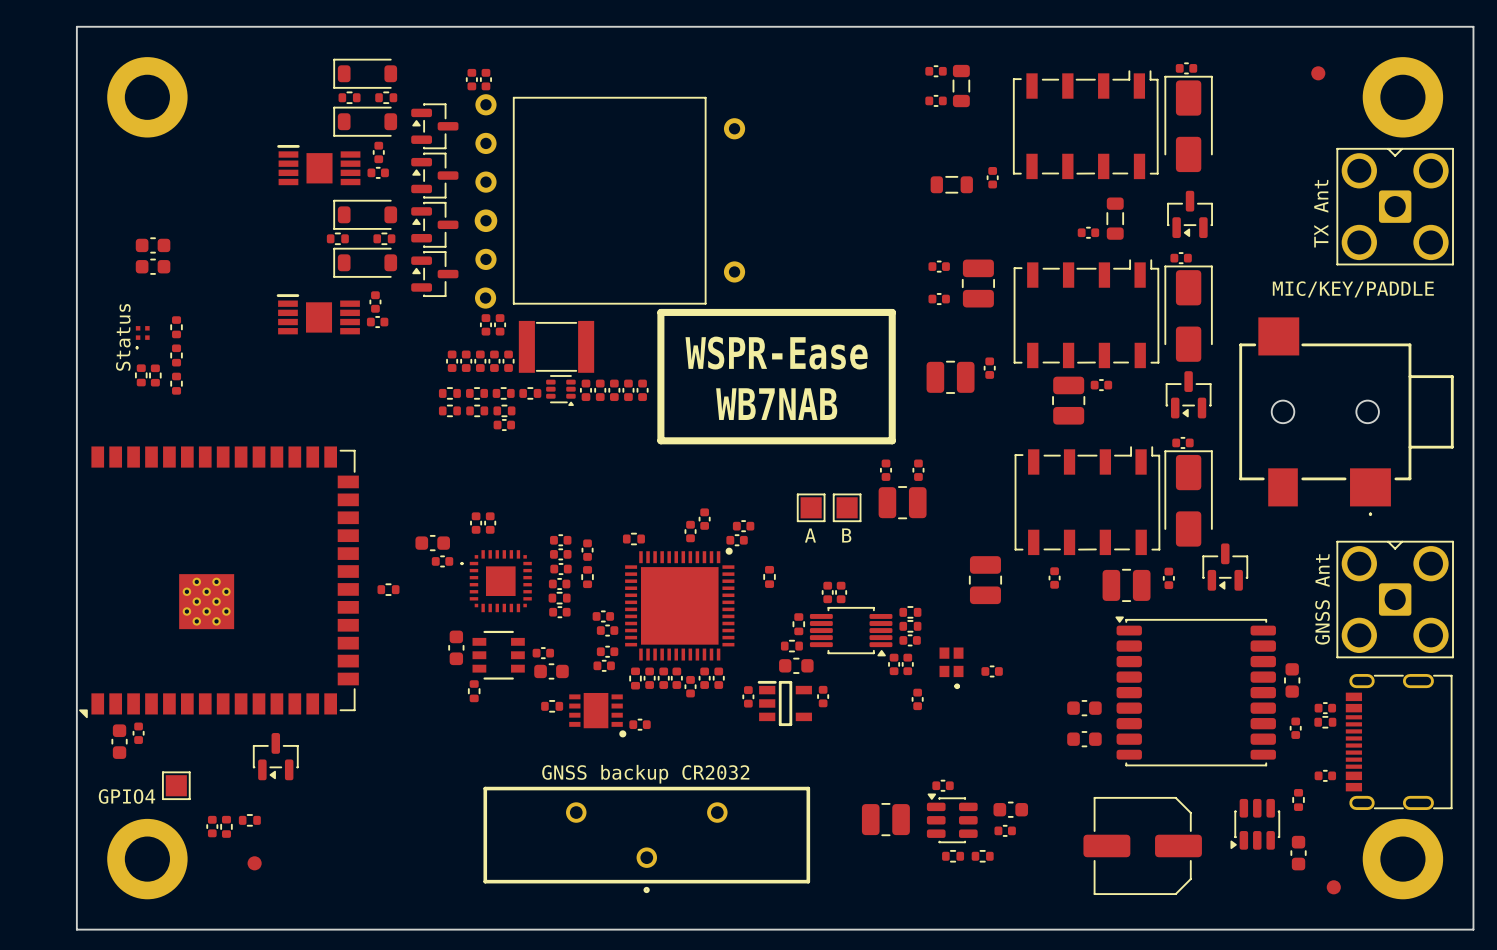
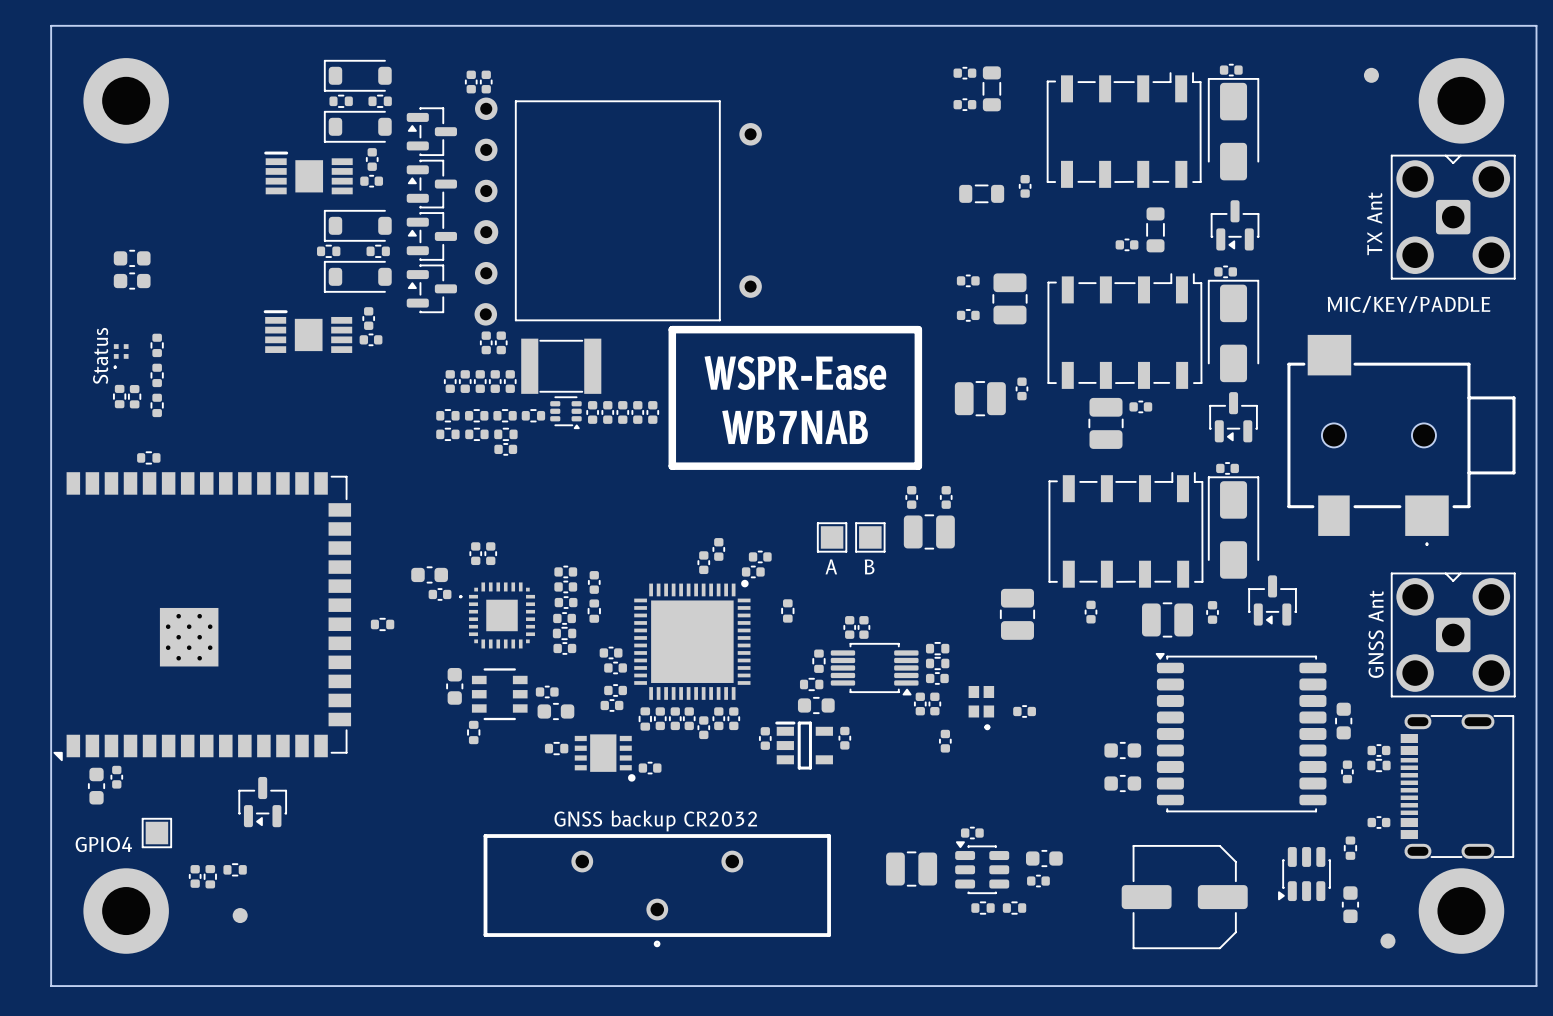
part: none -> (148, 457)
part: (633, 539) -> none

